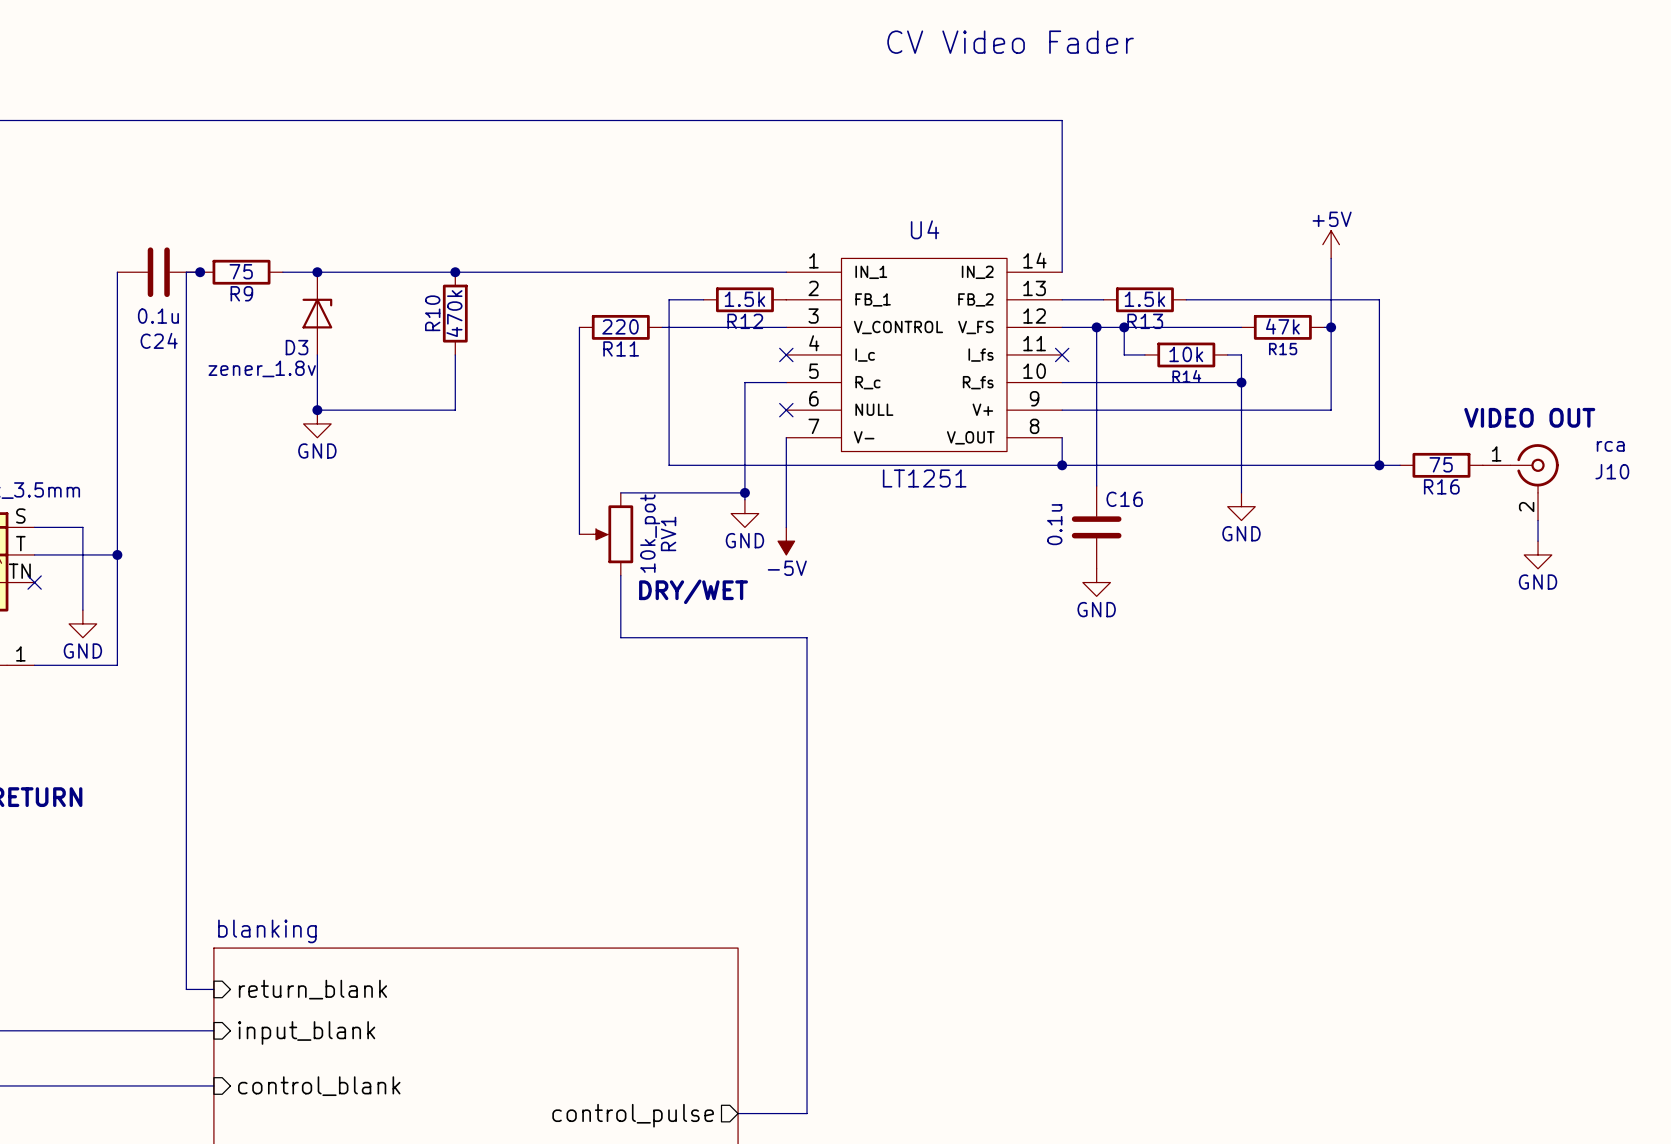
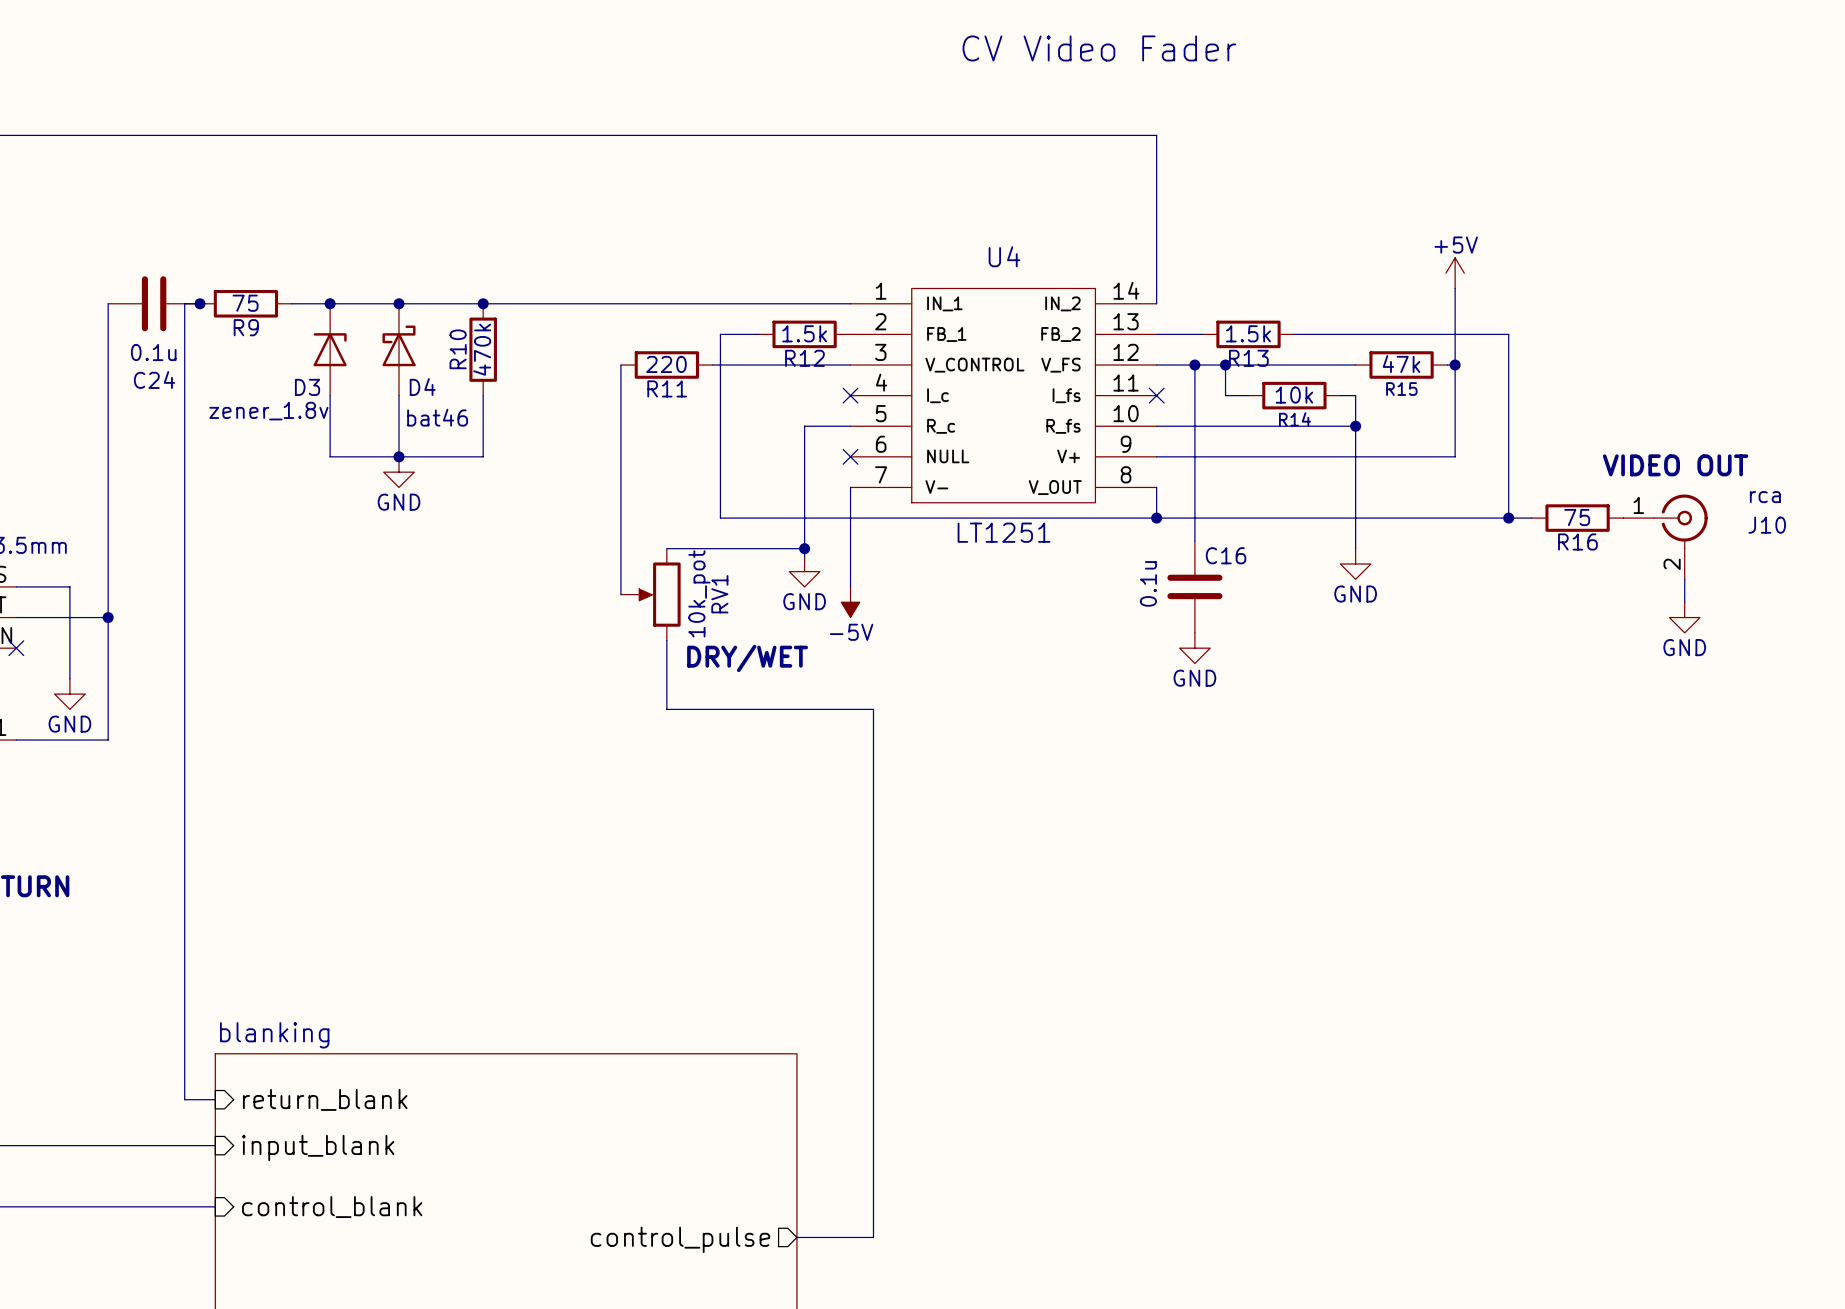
junction: none -> (398, 303)
D4: none -> bat46 (398, 349)
wire: none -> (398, 395) (398, 456)
junction position: (317, 410) -> (398, 456)
power symbol position: GND (317, 423) -> GND (398, 472)

